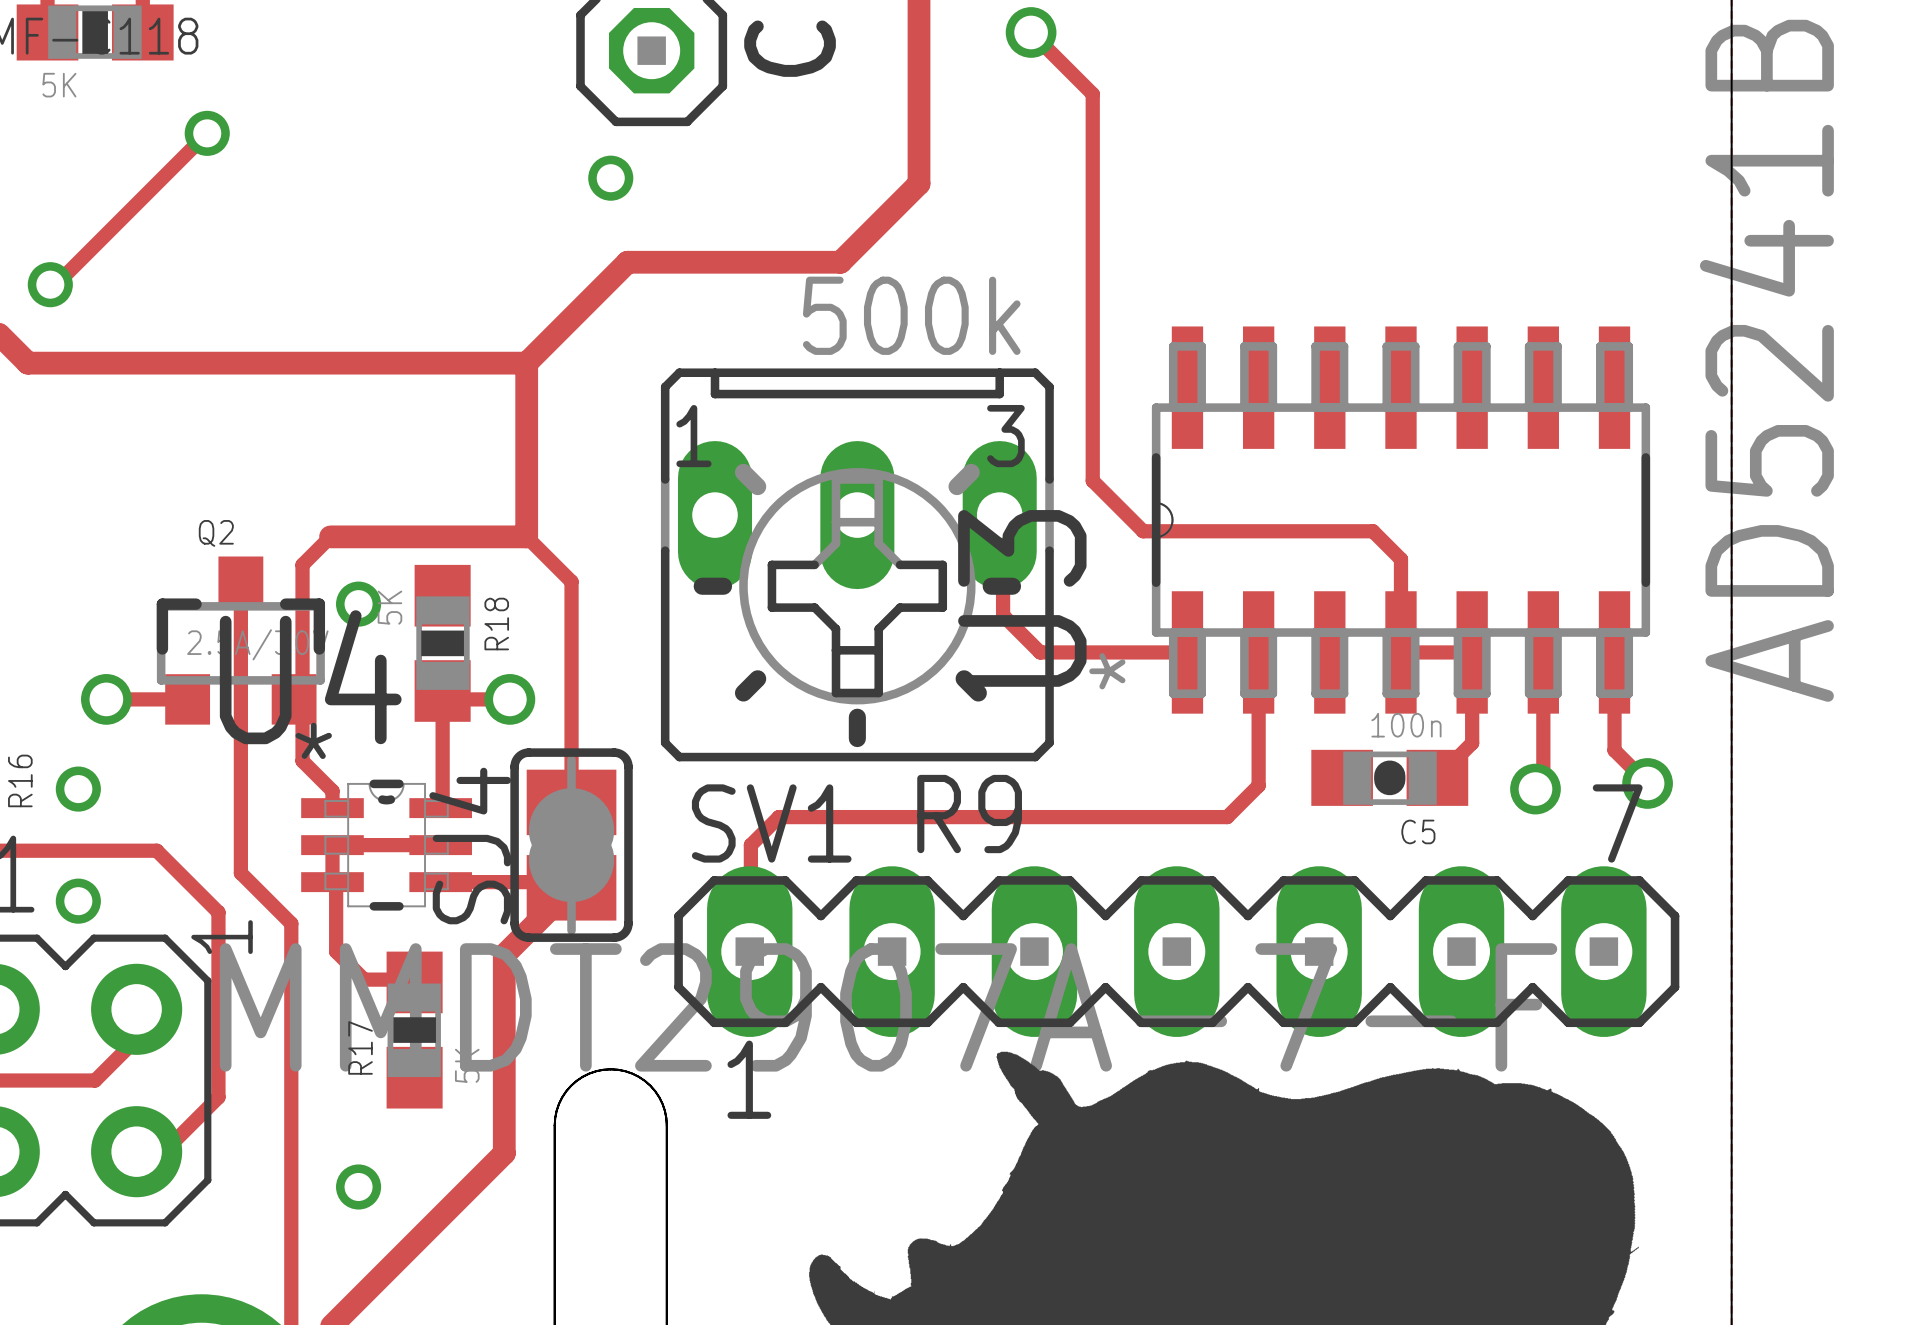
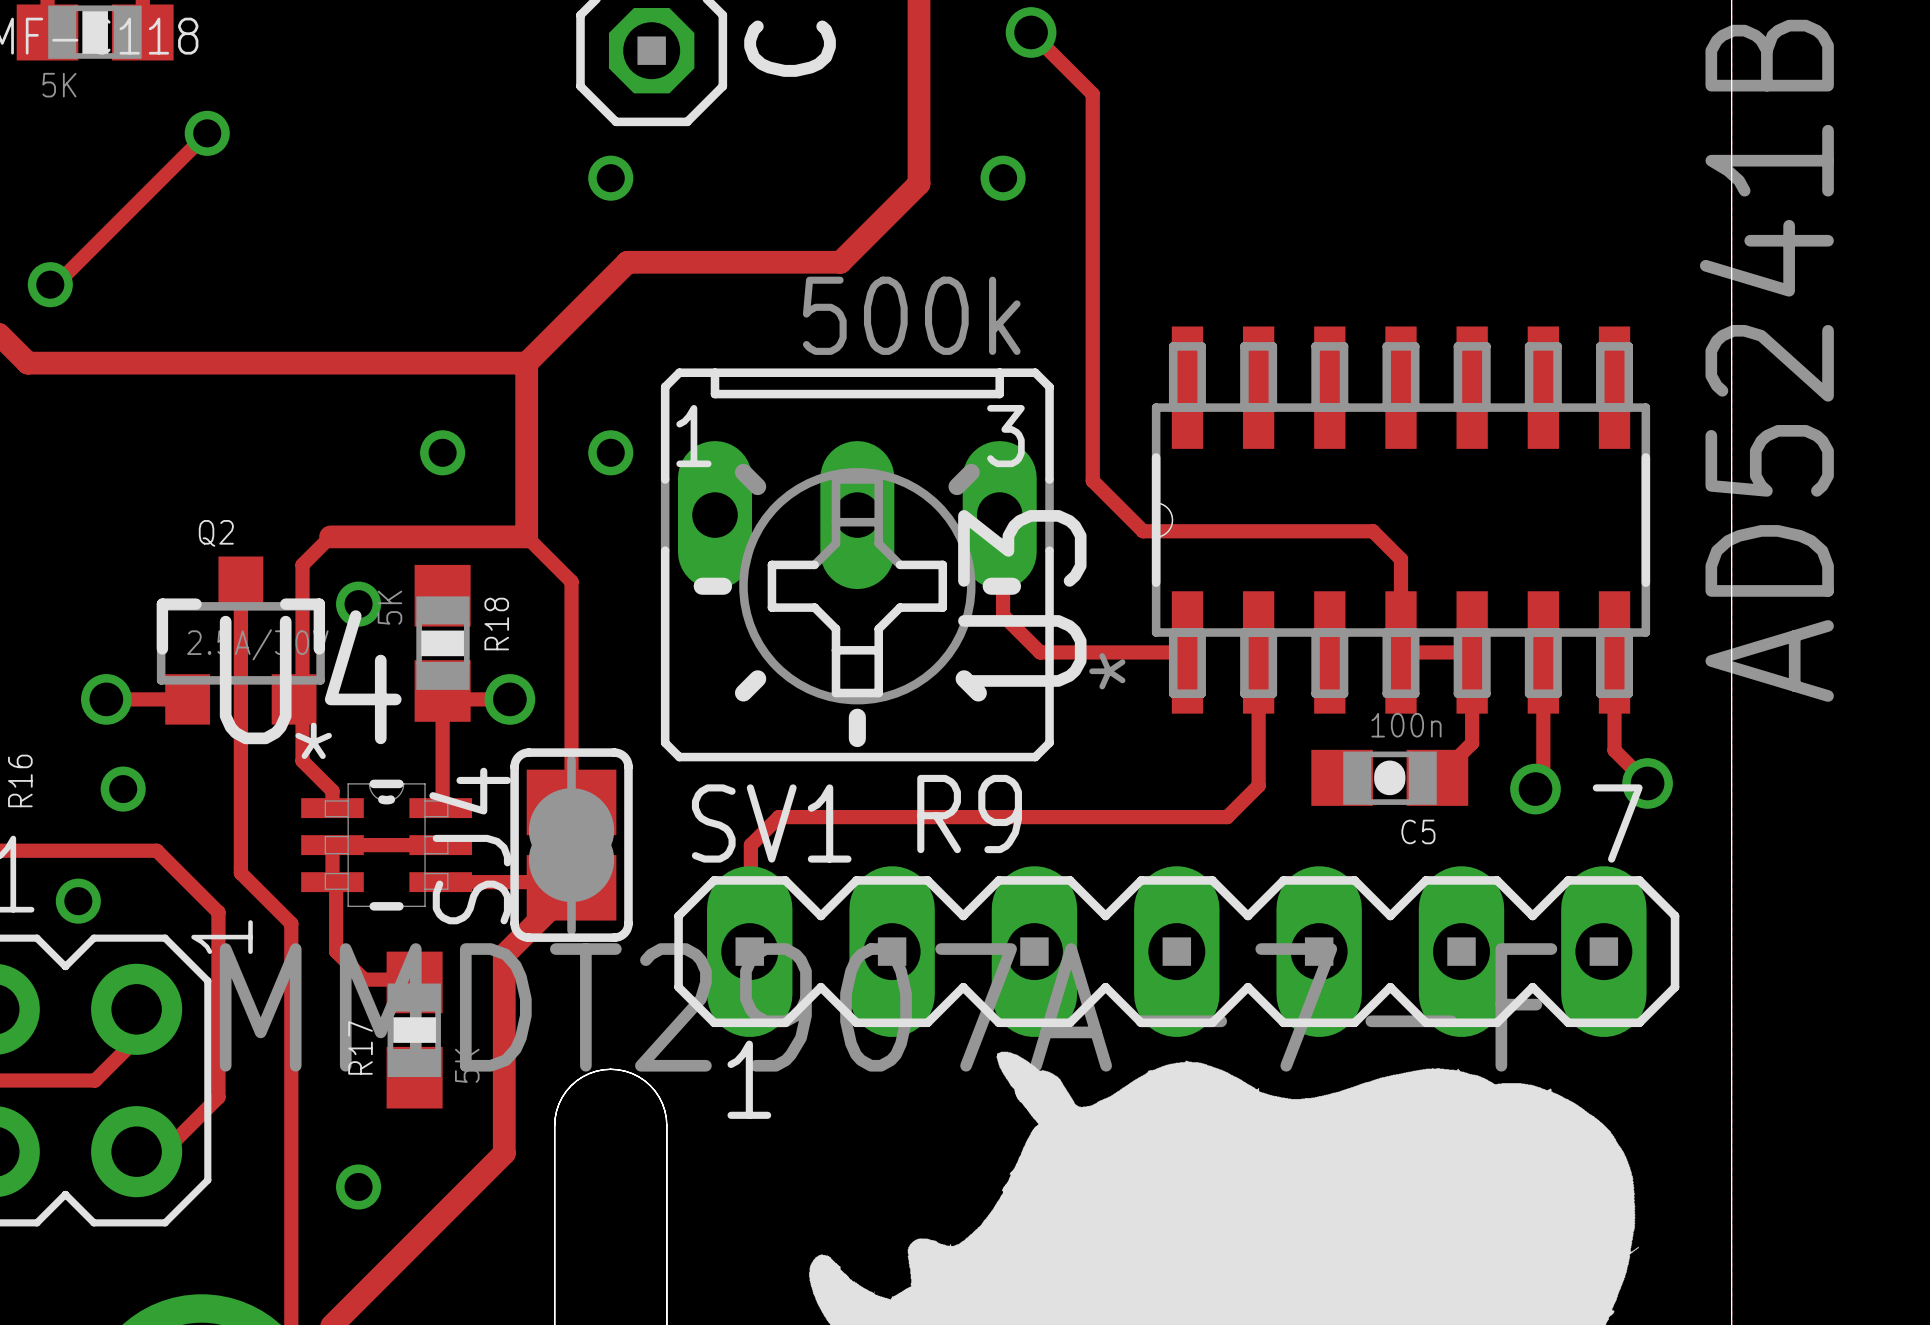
via: none -> (1003, 178)
via: none -> (442, 452)
via: none -> (610, 452)
via position: (78, 789) -> (123, 789)

